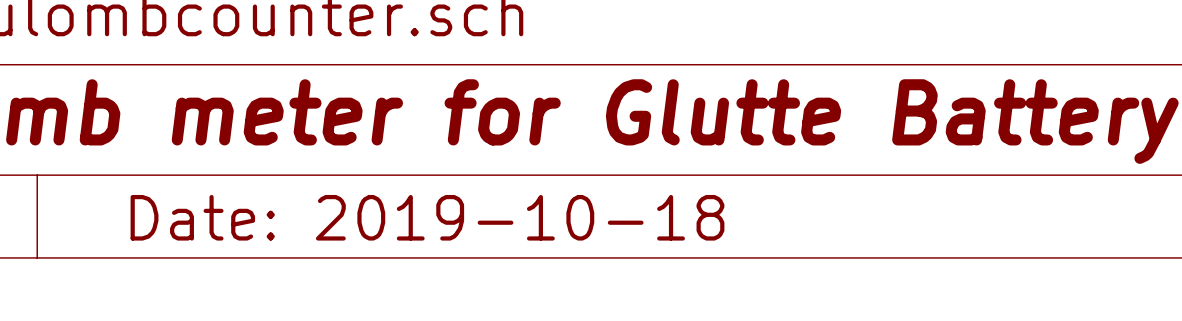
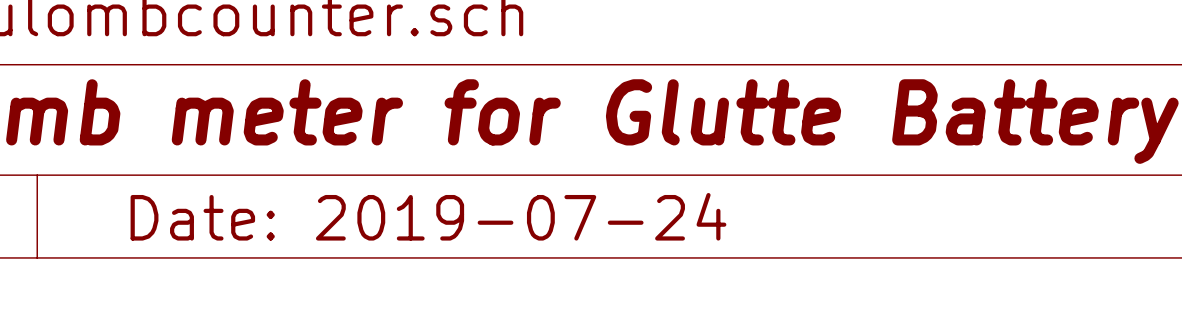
title block: Date: 2019-10-18 (427, 217) -> Date: 2019-07-24 (428, 216)

